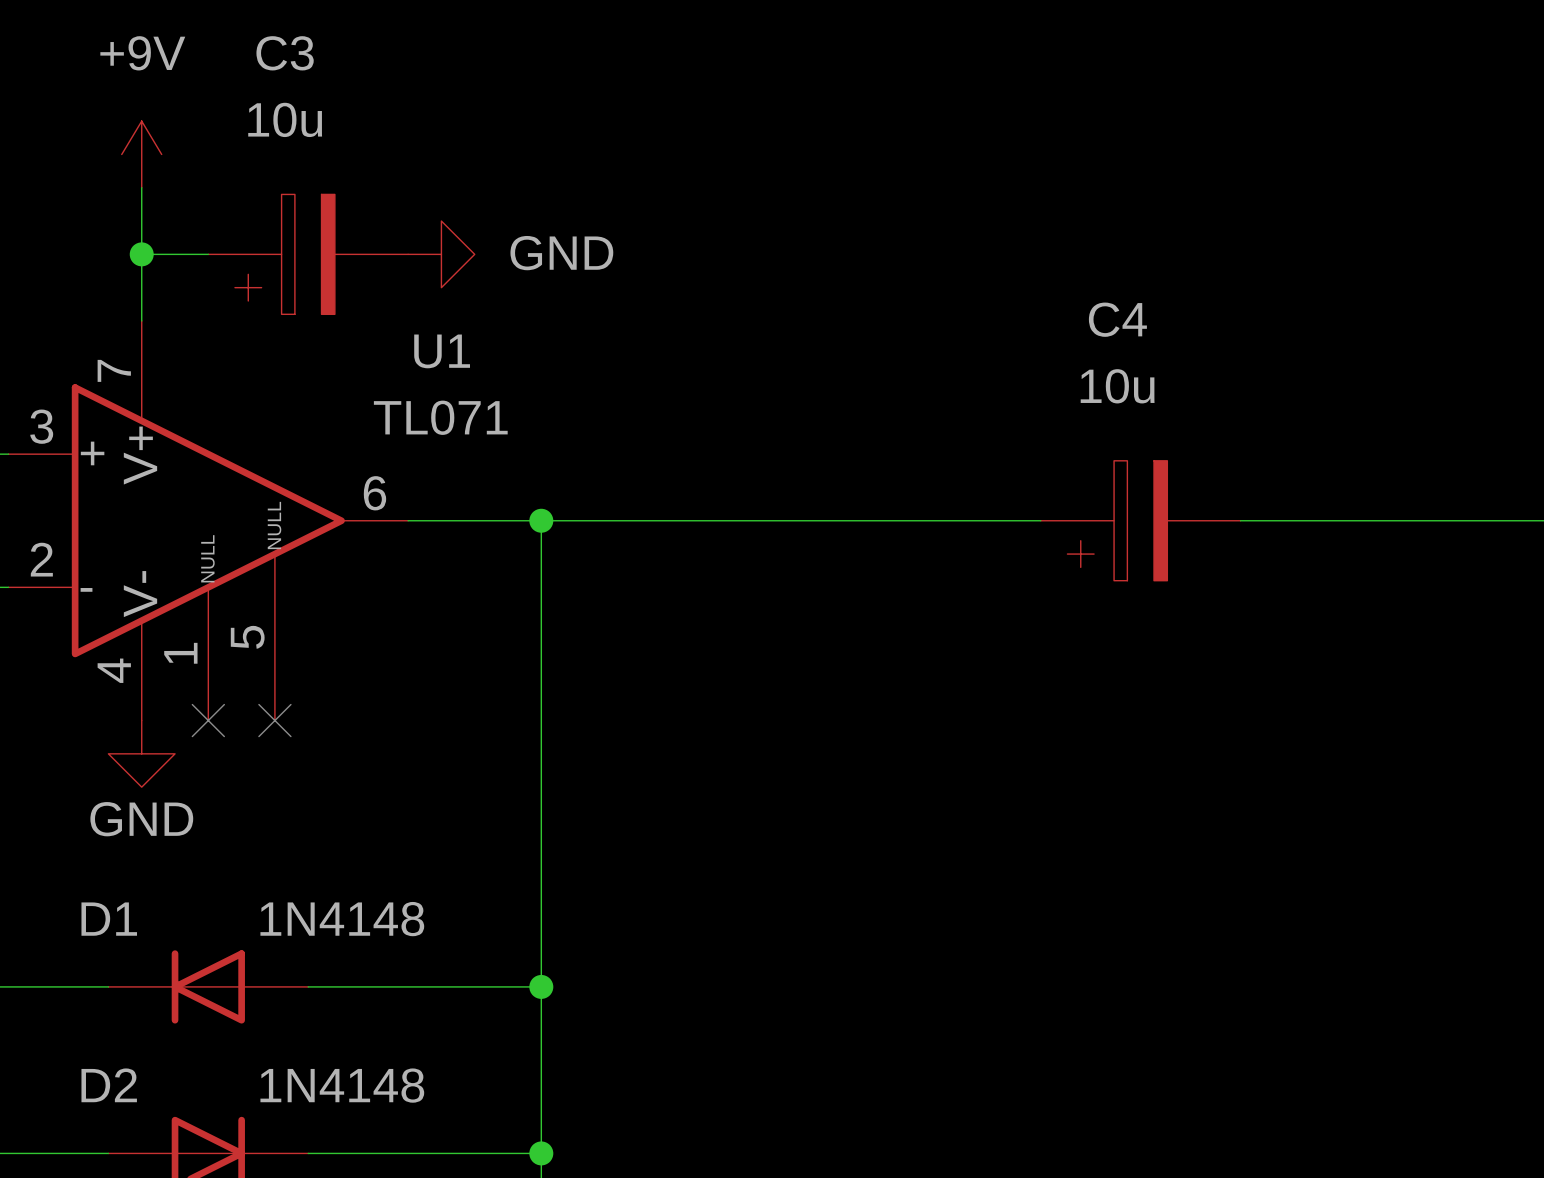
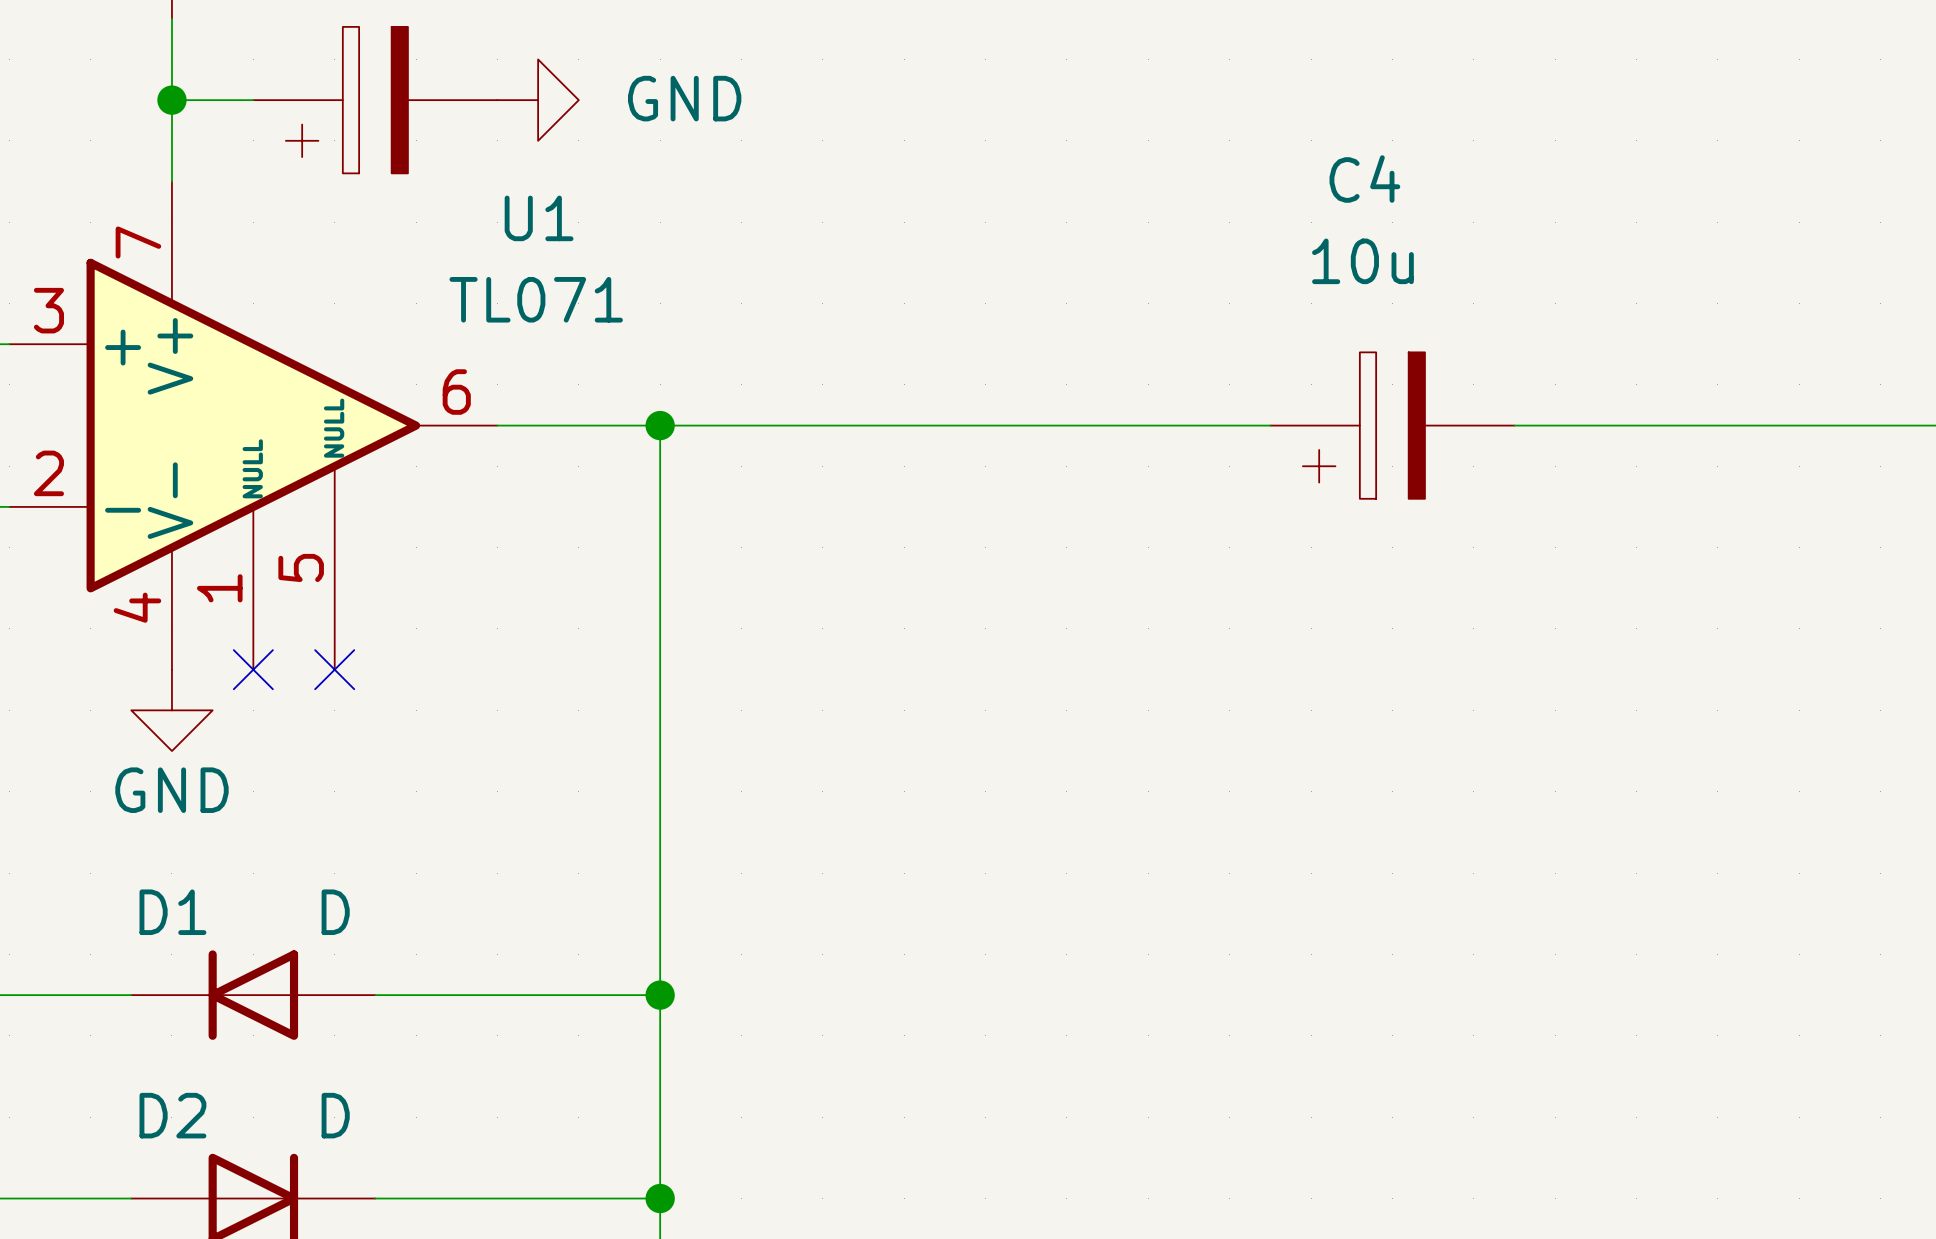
D1 name position: D1 (109, 919) -> D1 (172, 912)
D1 value: 1N4148 (342, 919) -> D (335, 912)
D2 name position: D2 (109, 1085) -> D2 (172, 1115)
D2 value: 1N4148 (342, 1085) -> D (335, 1115)

